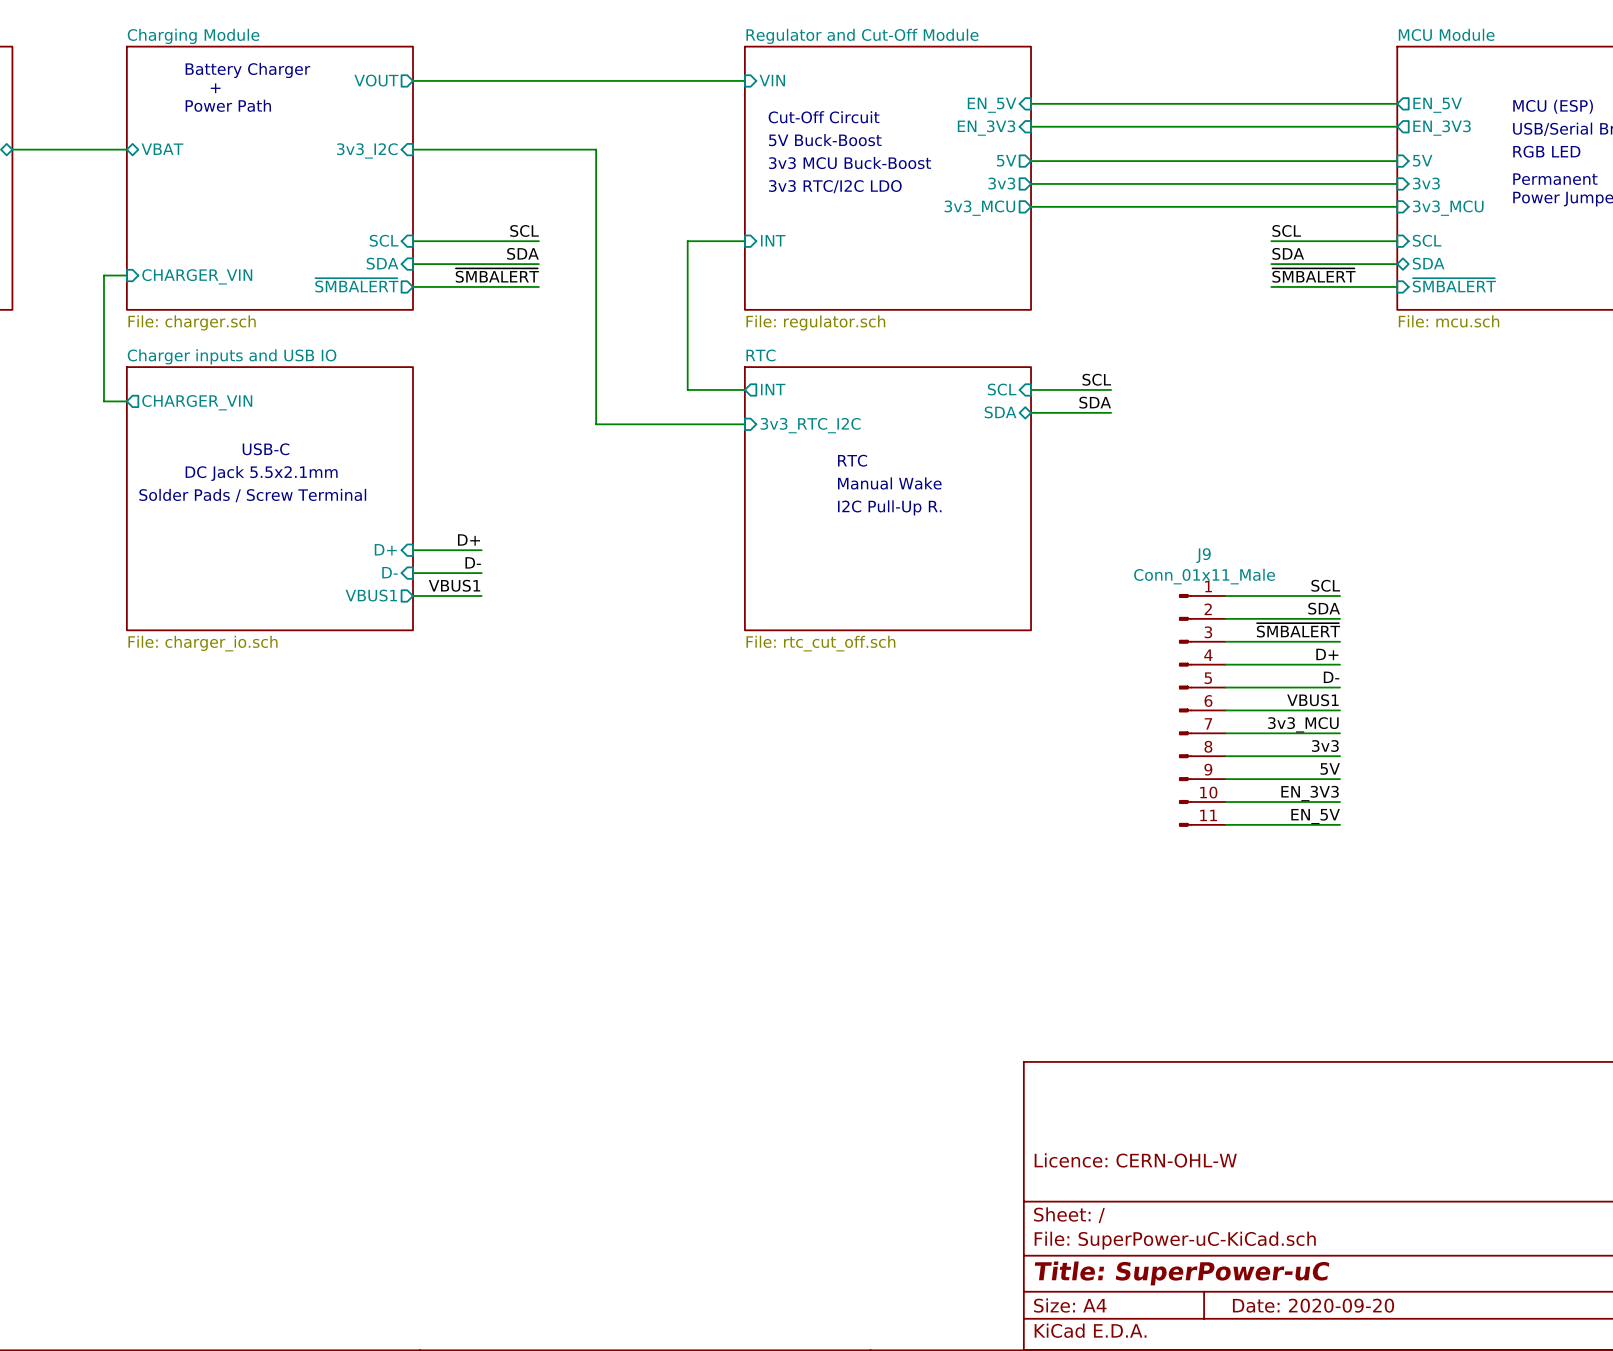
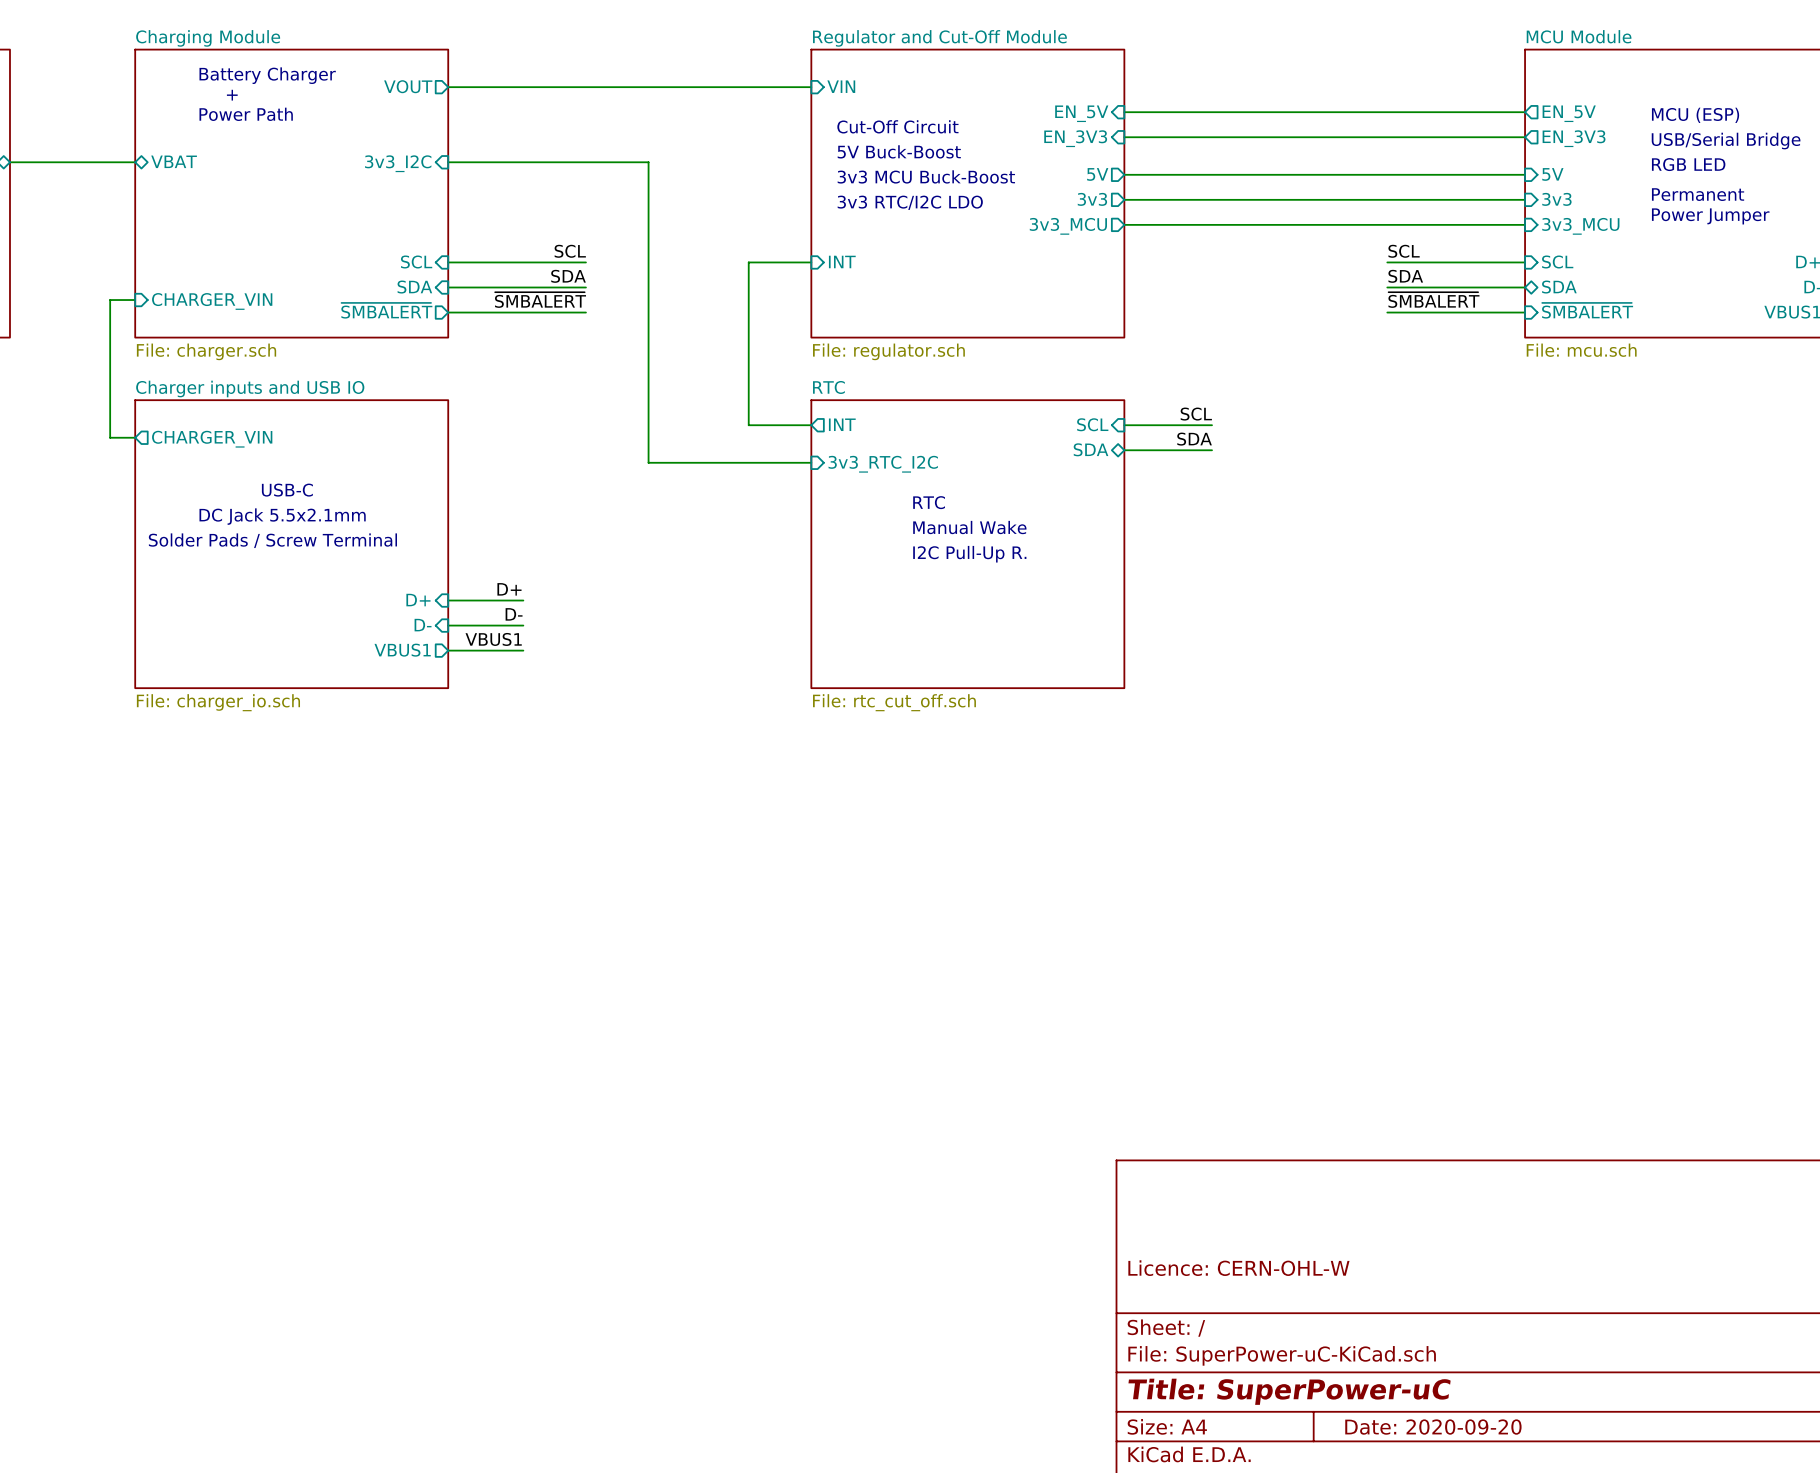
label: SCL (1325, 585) -> none
wire: (1225, 595) (1340, 595) -> none
label: SDA (1324, 608) -> none
wire: (1225, 618) (1340, 618) -> none
label: ~{SMBALERT} (1298, 630) -> none
wire: (1225, 641) (1340, 641) -> none
label: D+ (1327, 654) -> none
wire: (1225, 664) (1340, 664) -> none
label: D- (1331, 677) -> none
wire: (1225, 687) (1340, 687) -> none
label: VBUS1 (1312, 700) -> none
J9: Conn_01x11_Male (1202, 710) -> none
wire: (1225, 710) (1340, 710) -> none
label: 3v3_MCU (1303, 724) -> none
wire: (1225, 733) (1340, 733) -> none
label: 3v3 (1325, 746) -> none
wire: (1225, 756) (1340, 756) -> none
label: 5V (1330, 769) -> none
wire: (1225, 779) (1340, 779) -> none
label: EN_3V3 (1310, 793) -> none
wire: (1225, 801) (1340, 801) -> none
label: EN_5V (1315, 816) -> none
wire: (1225, 824) (1340, 824) -> none

